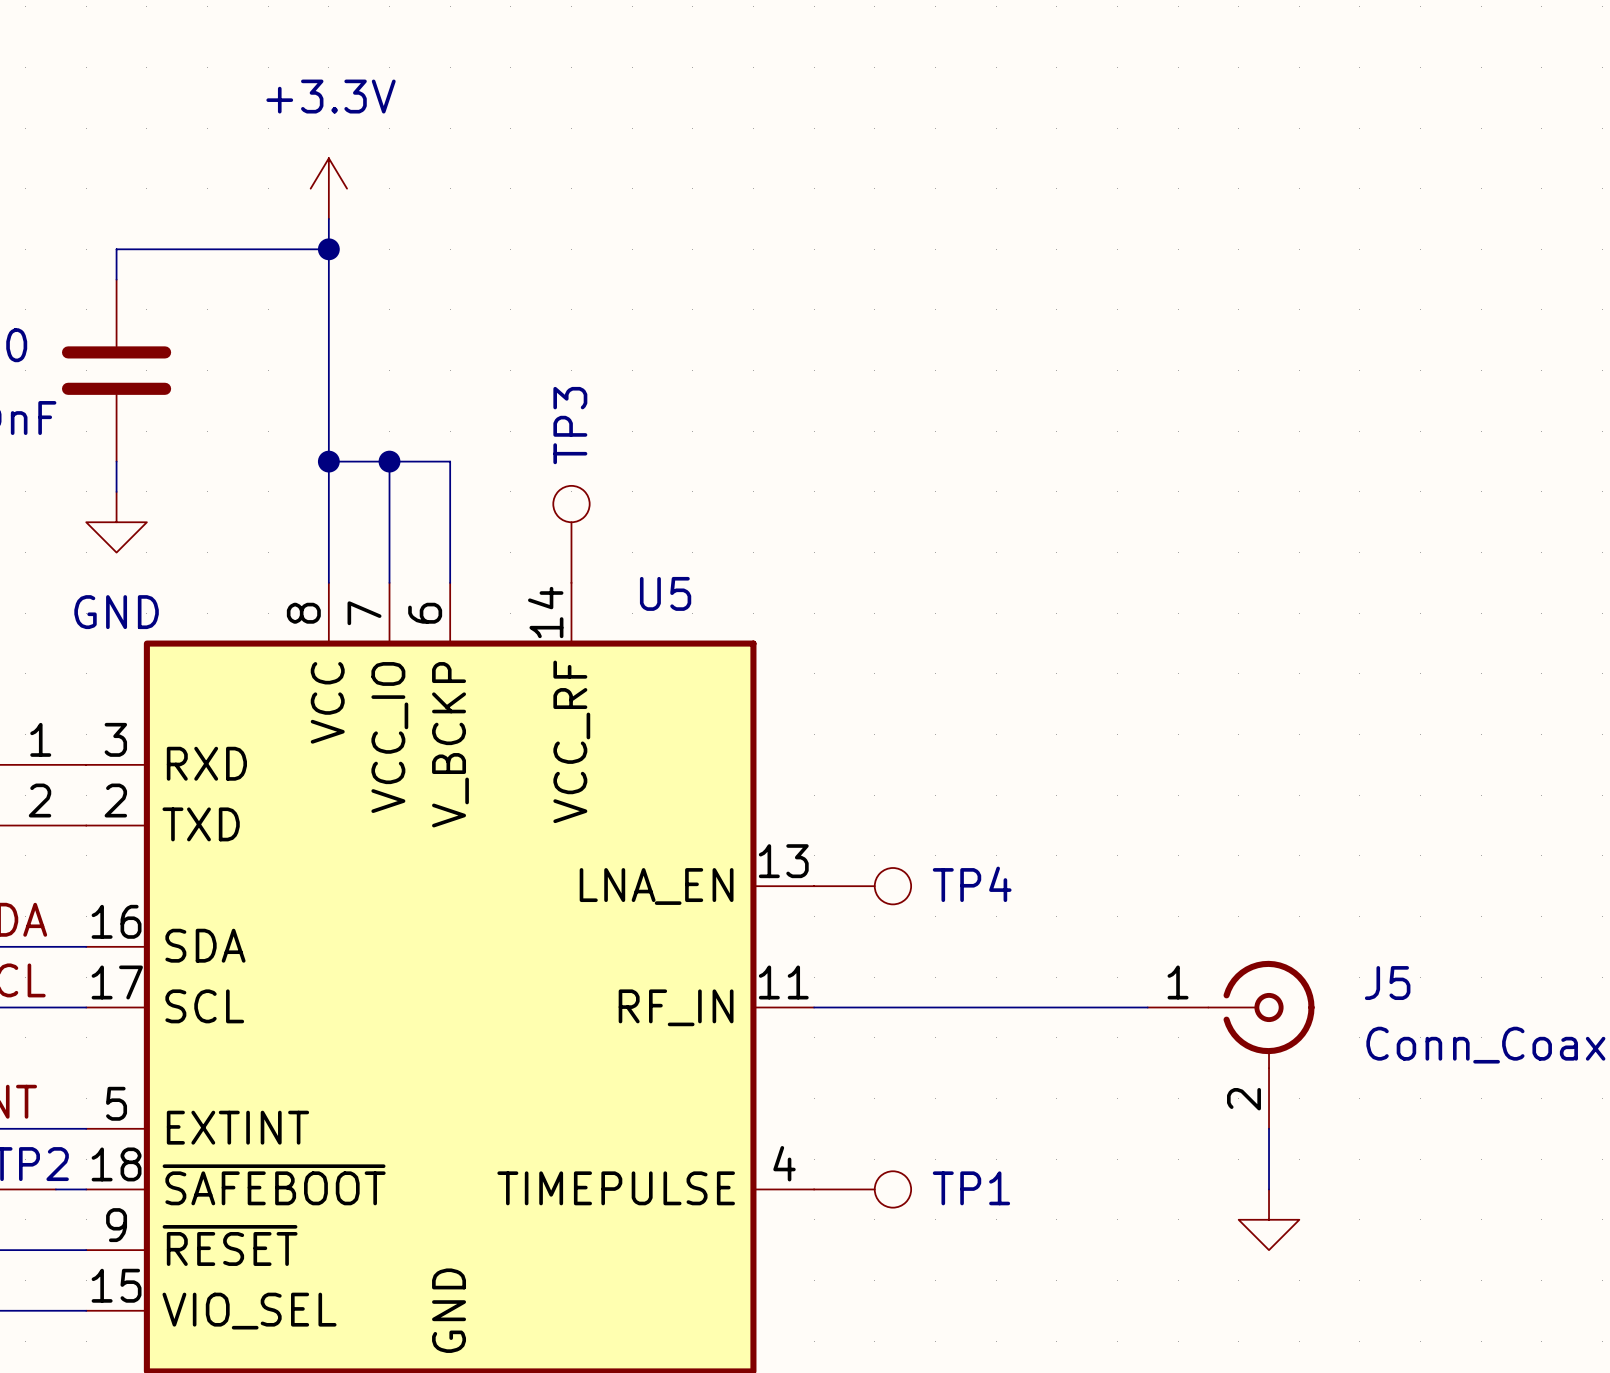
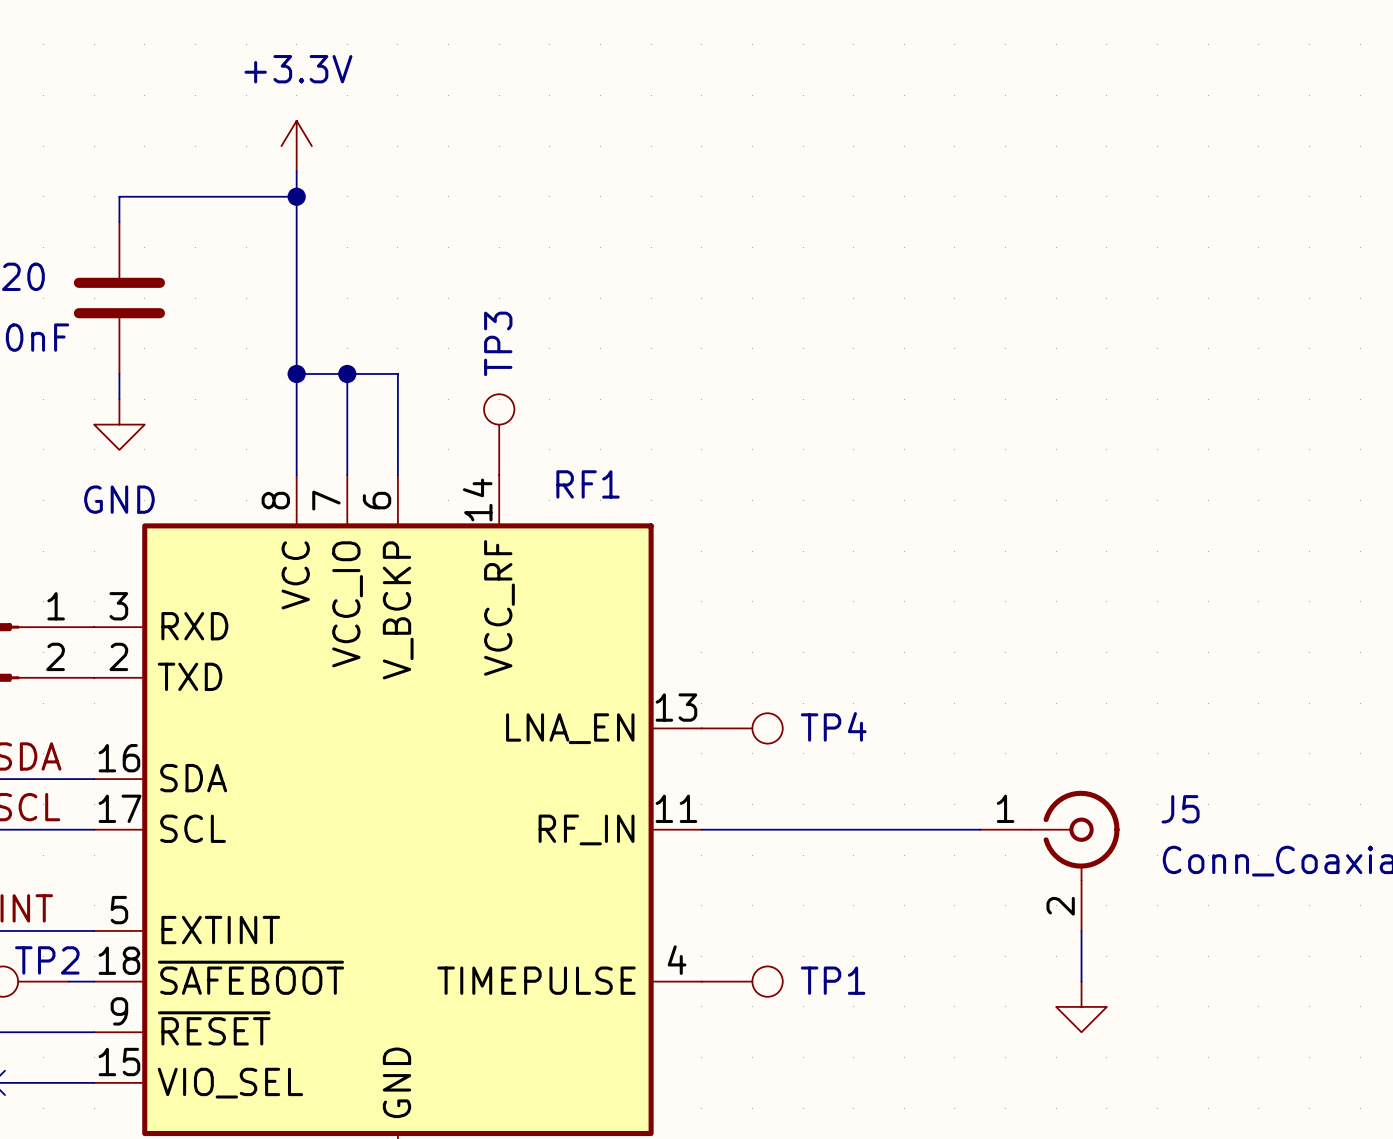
U5 name: U5 (665, 593) -> RF1 (588, 484)

